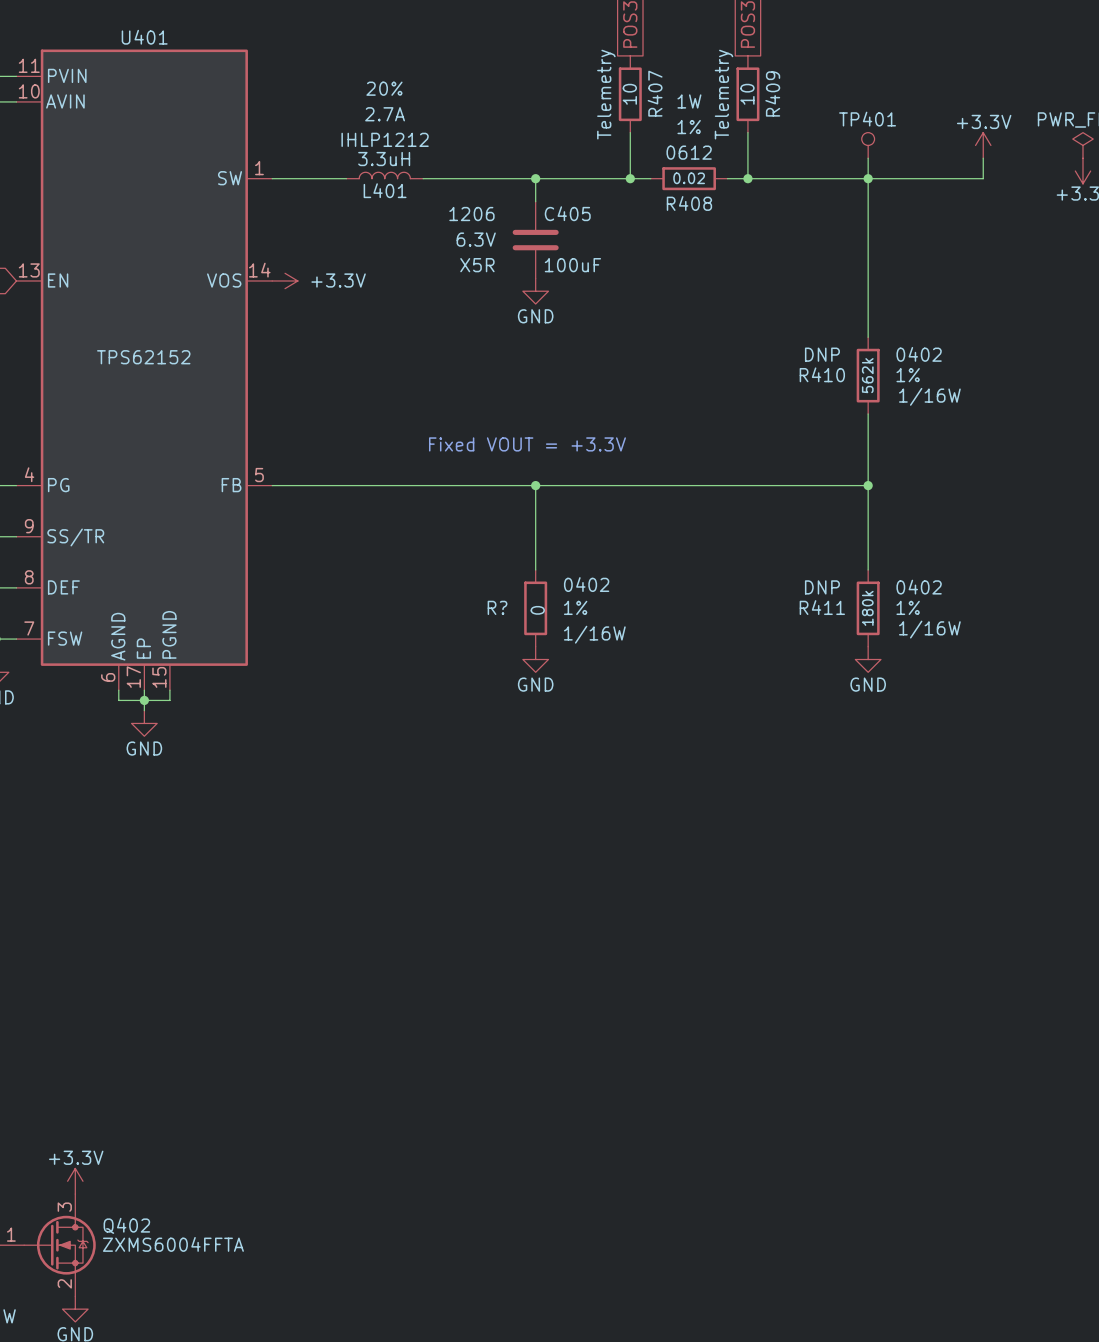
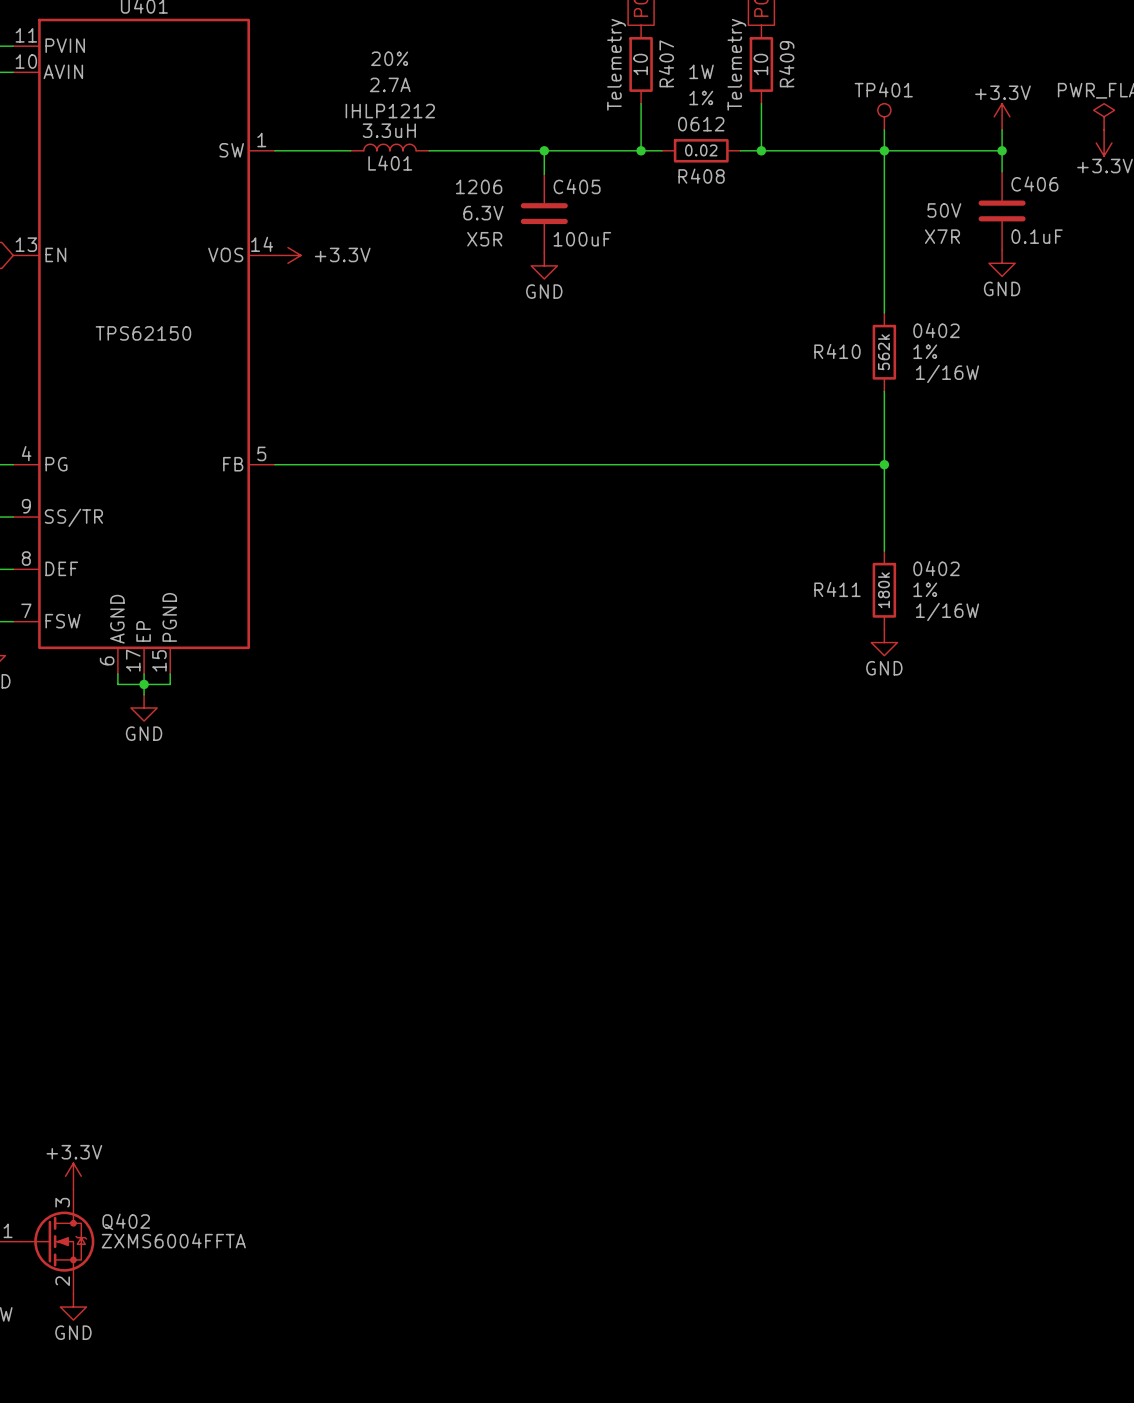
wire: none -> (1002, 150) (1002, 171)
junction: none -> (1002, 150)
C406: none -> 0.1uF (1002, 210)
power symbol: none -> GND (1002, 263)
R410 text: DNP (822, 354) -> none
U401 value: TPS62152 (143, 357) -> TPS62150 (143, 333)
text: Fixed VOUT = +3.3V (527, 444) -> none
wire: (535, 485) (535, 569) -> none
junction: (535, 485) -> none
R411 text: DNP (822, 587) -> none
R?: 0 (535, 608) -> none
power symbol: GND (535, 659) -> none

